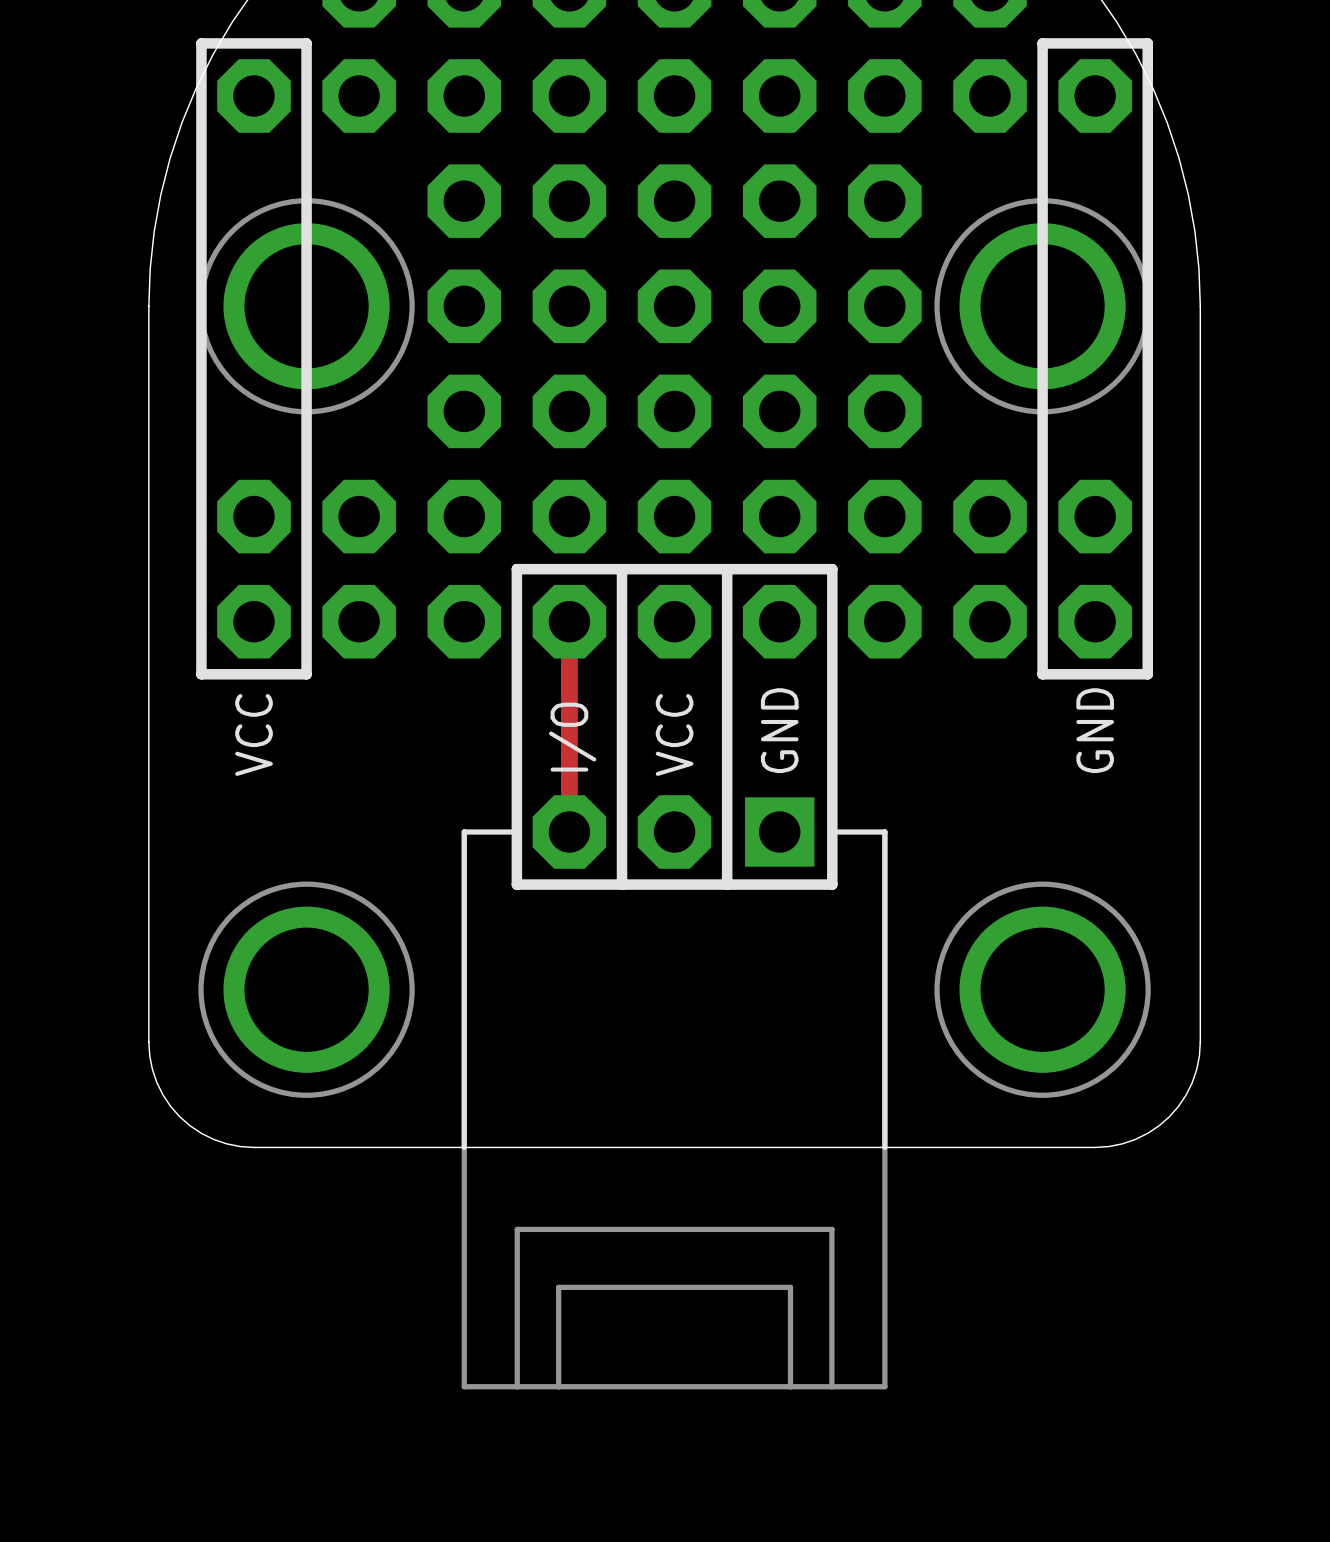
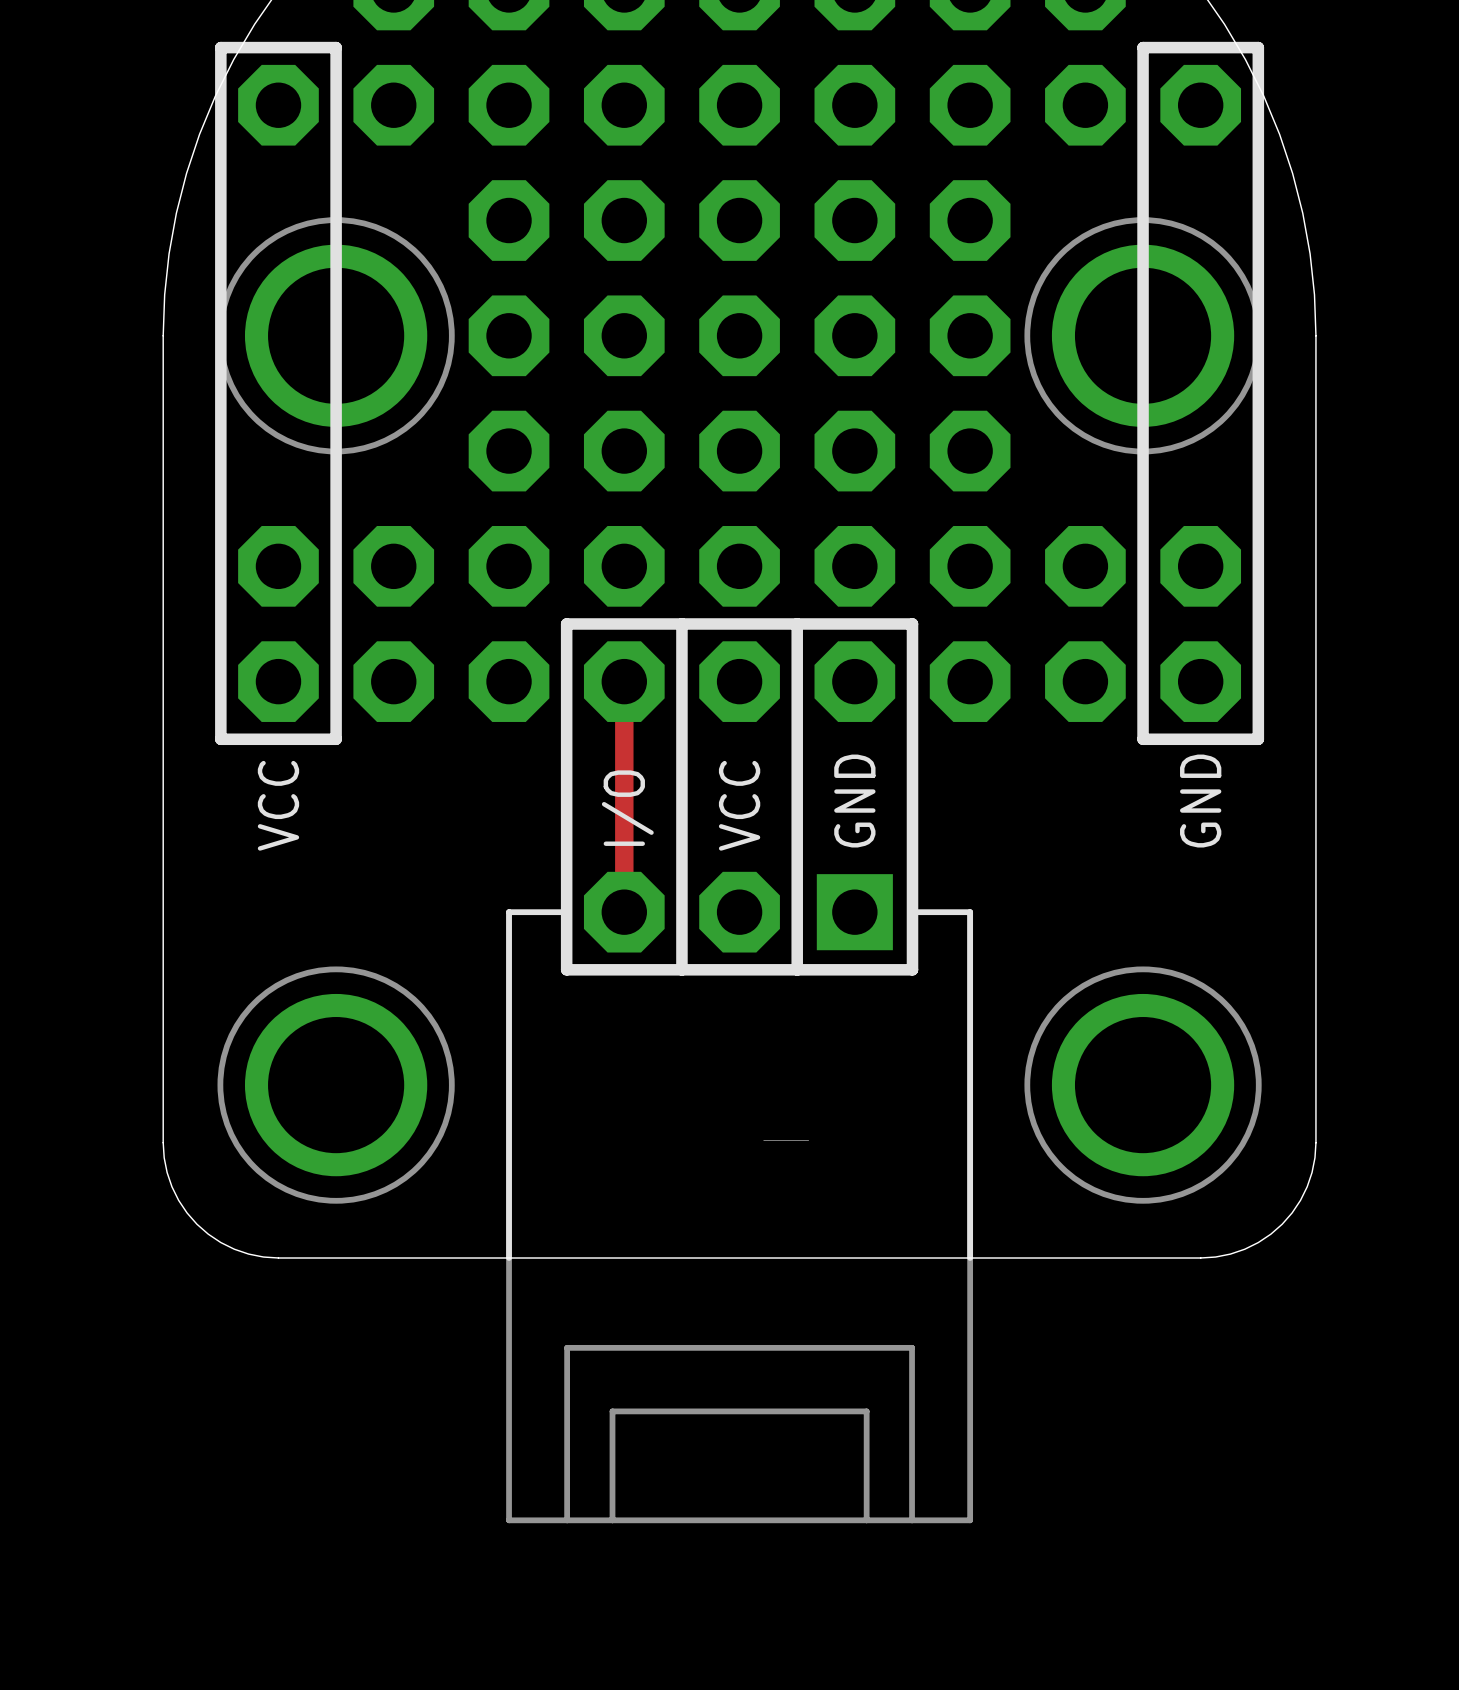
drawing: none -> [763, 1140, 809, 1141]

